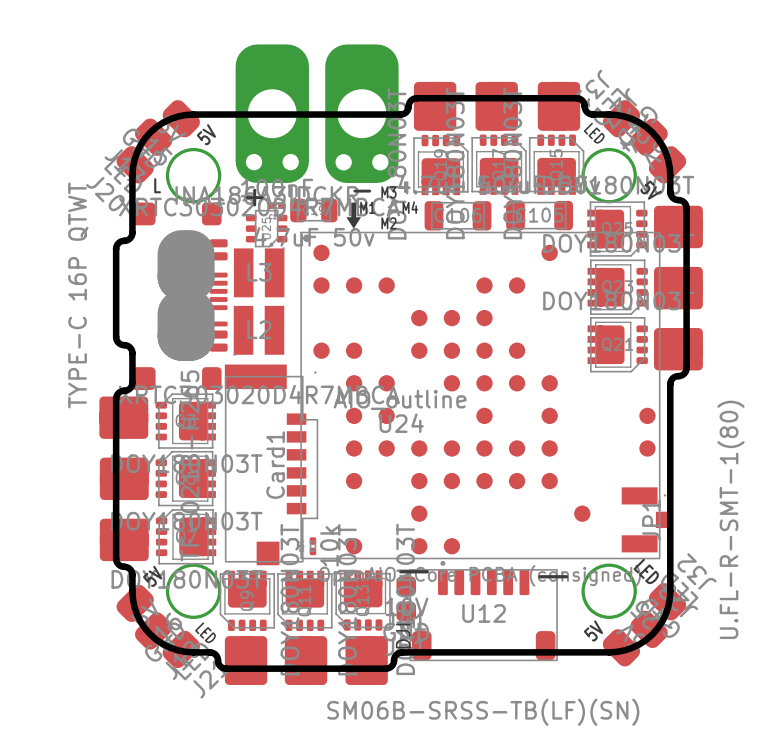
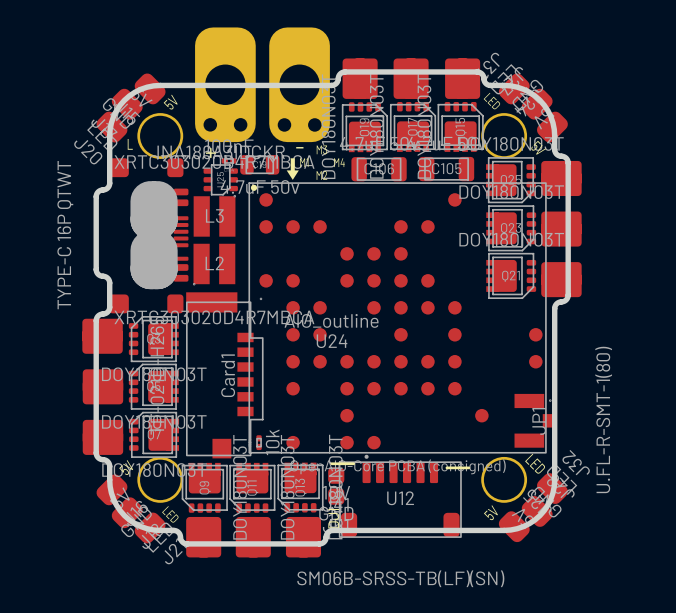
part footprint: [300, 231, 661, 560] -> [248, 182, 547, 454]

